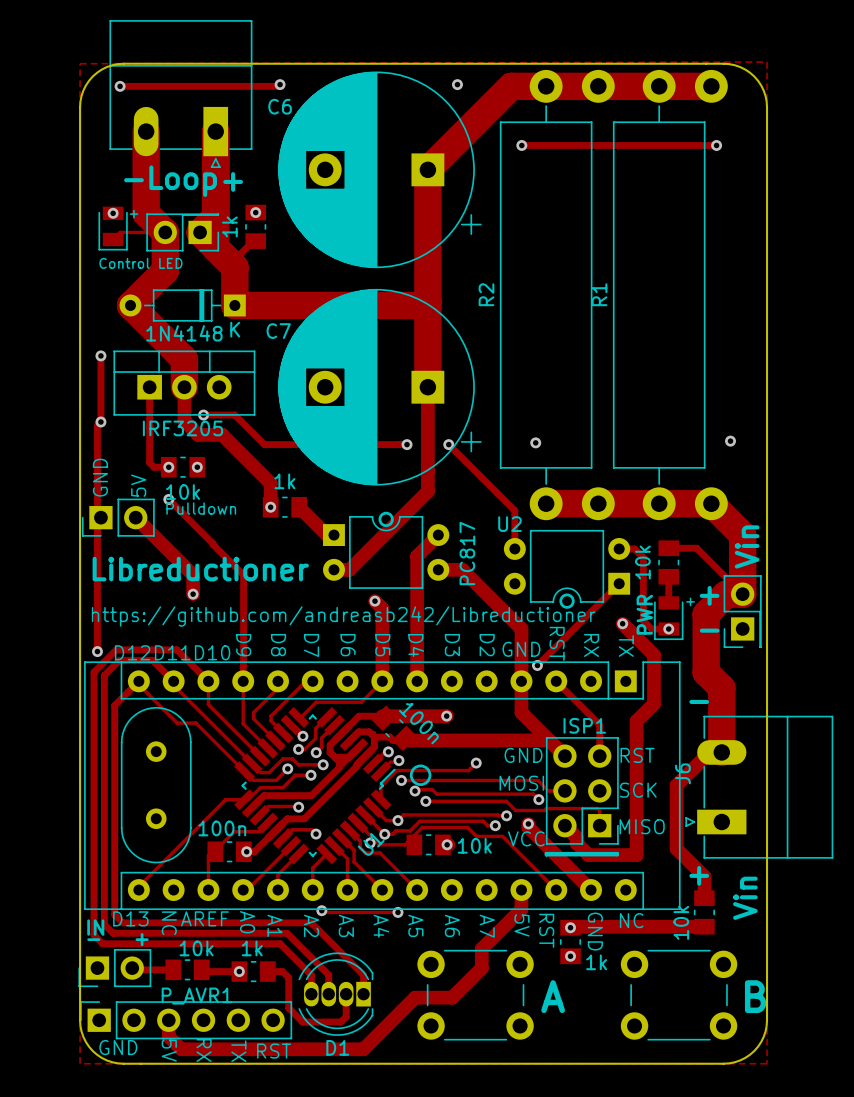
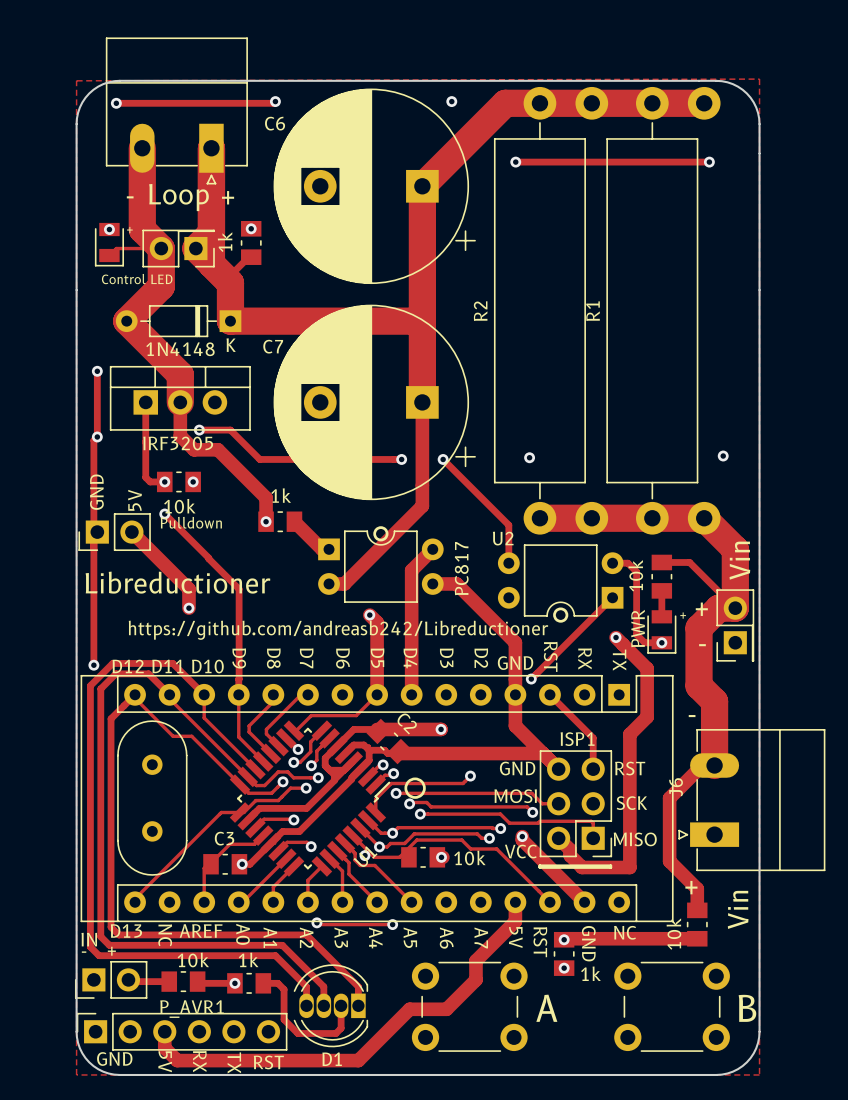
C2 name: none -> C2 (407, 723)
C2 value: 100n (419, 723) -> none
C3 name: none -> C3 (224, 838)
C3 value: 100n (222, 828) -> none

